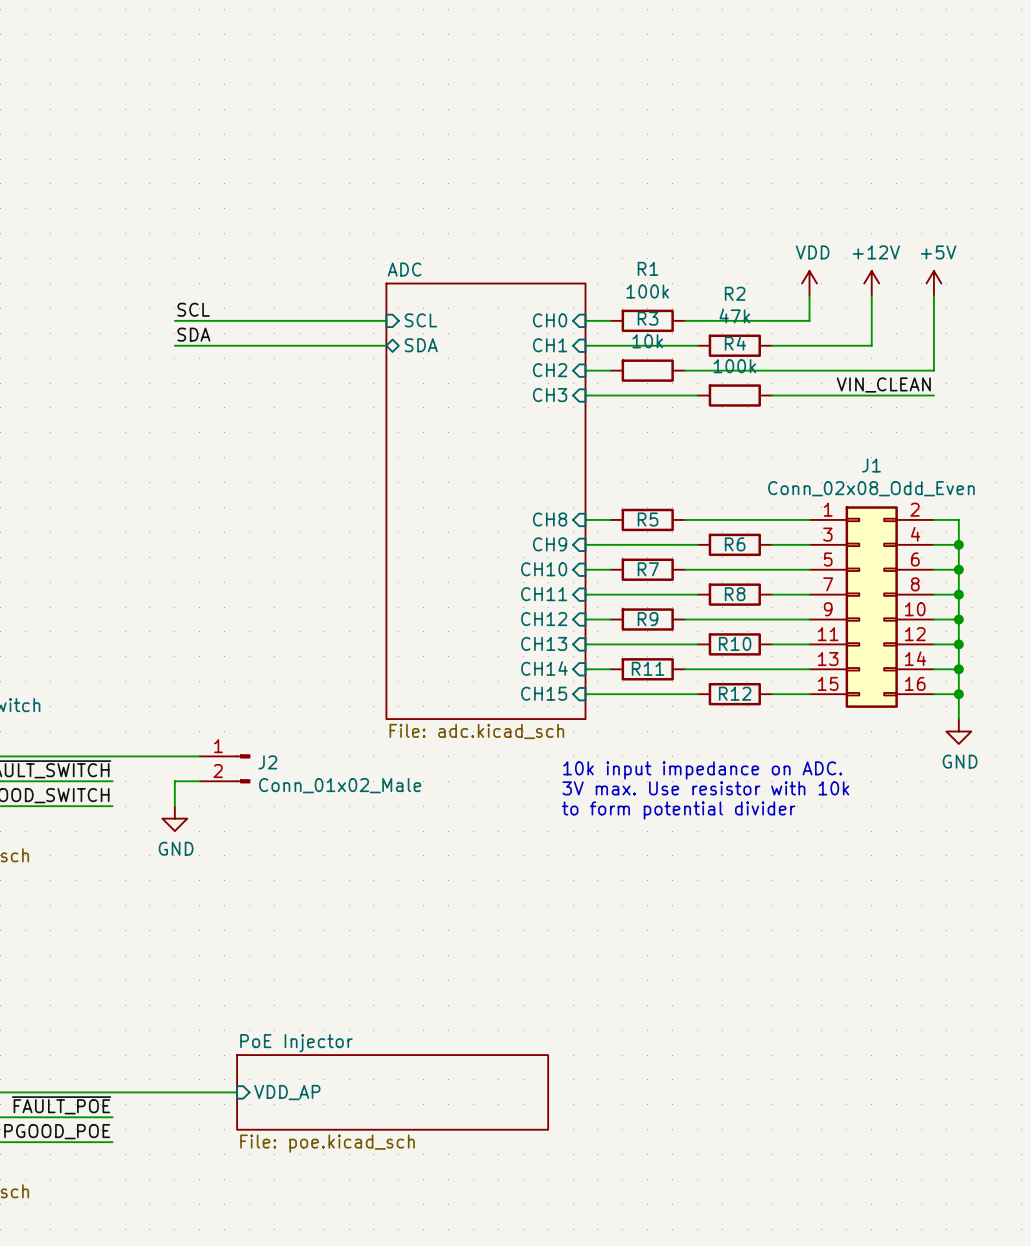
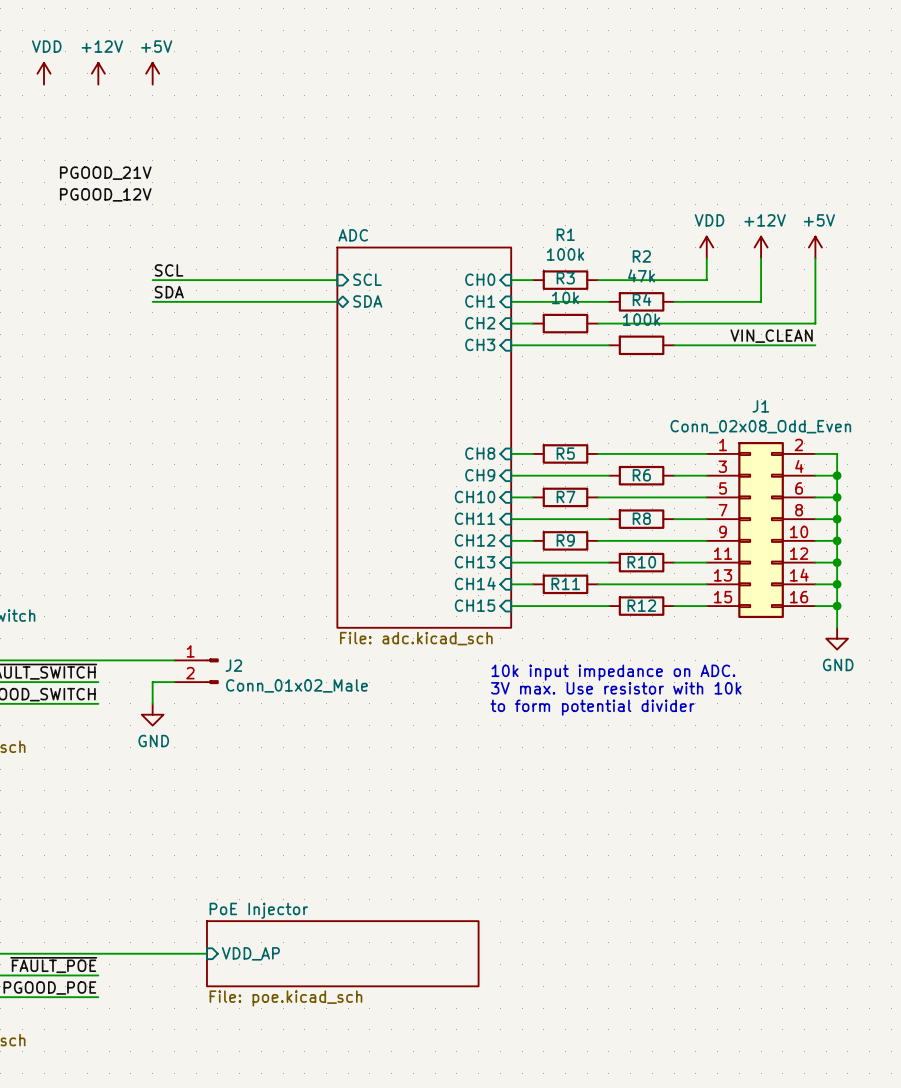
power symbol: none -> VDD (44, 73)
power symbol: none -> +12V (98, 73)
power symbol: none -> +5V (152, 73)
label: none -> PGOOD_21V (105, 173)
label: none -> PGOOD_12V (105, 194)

